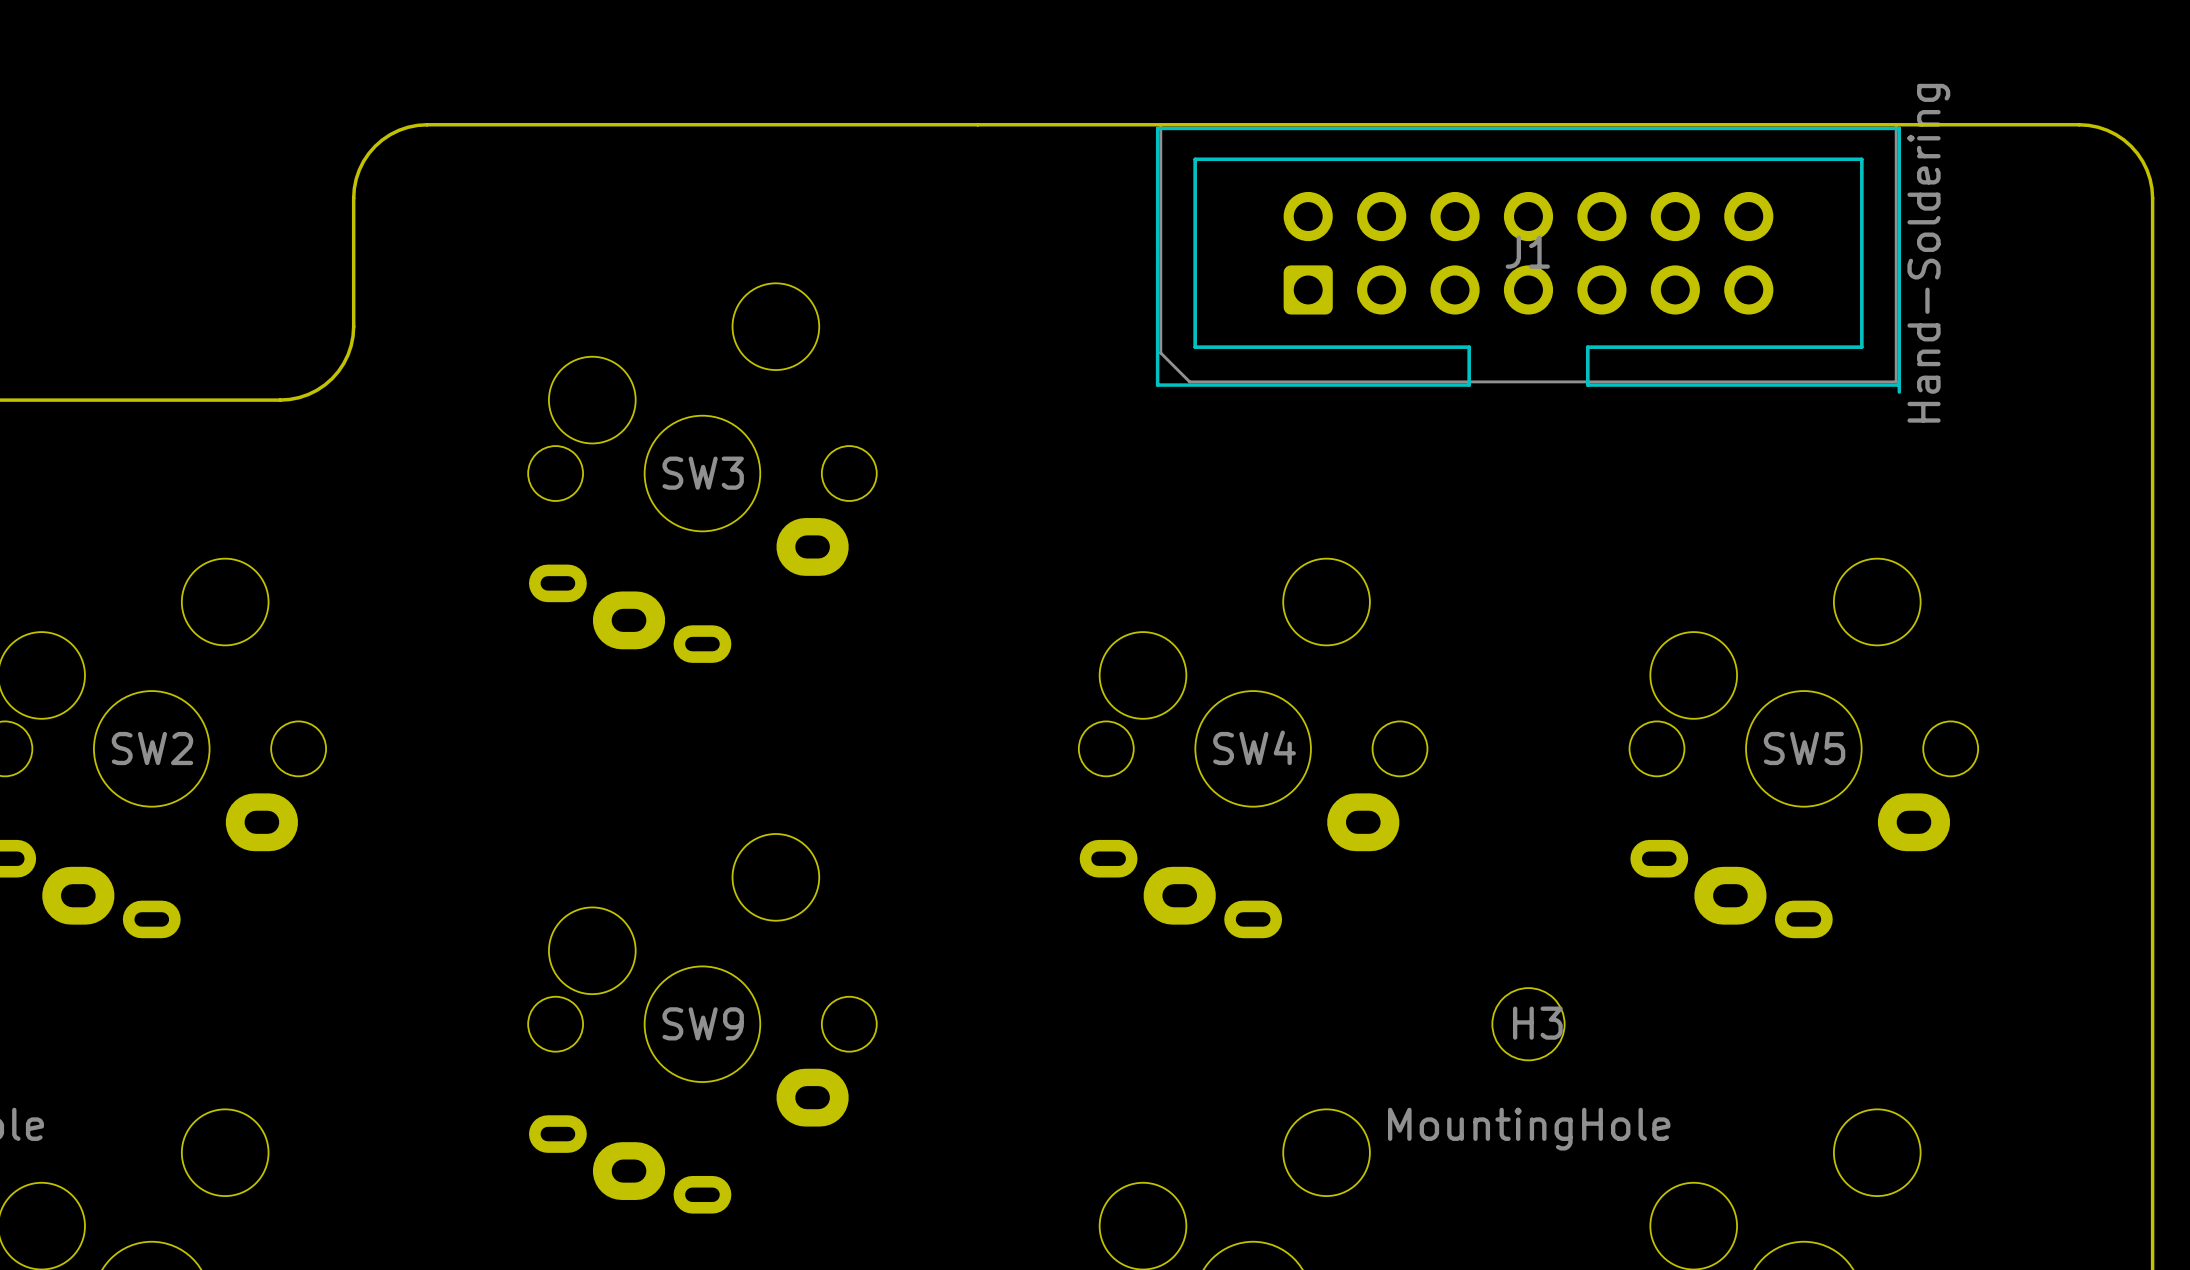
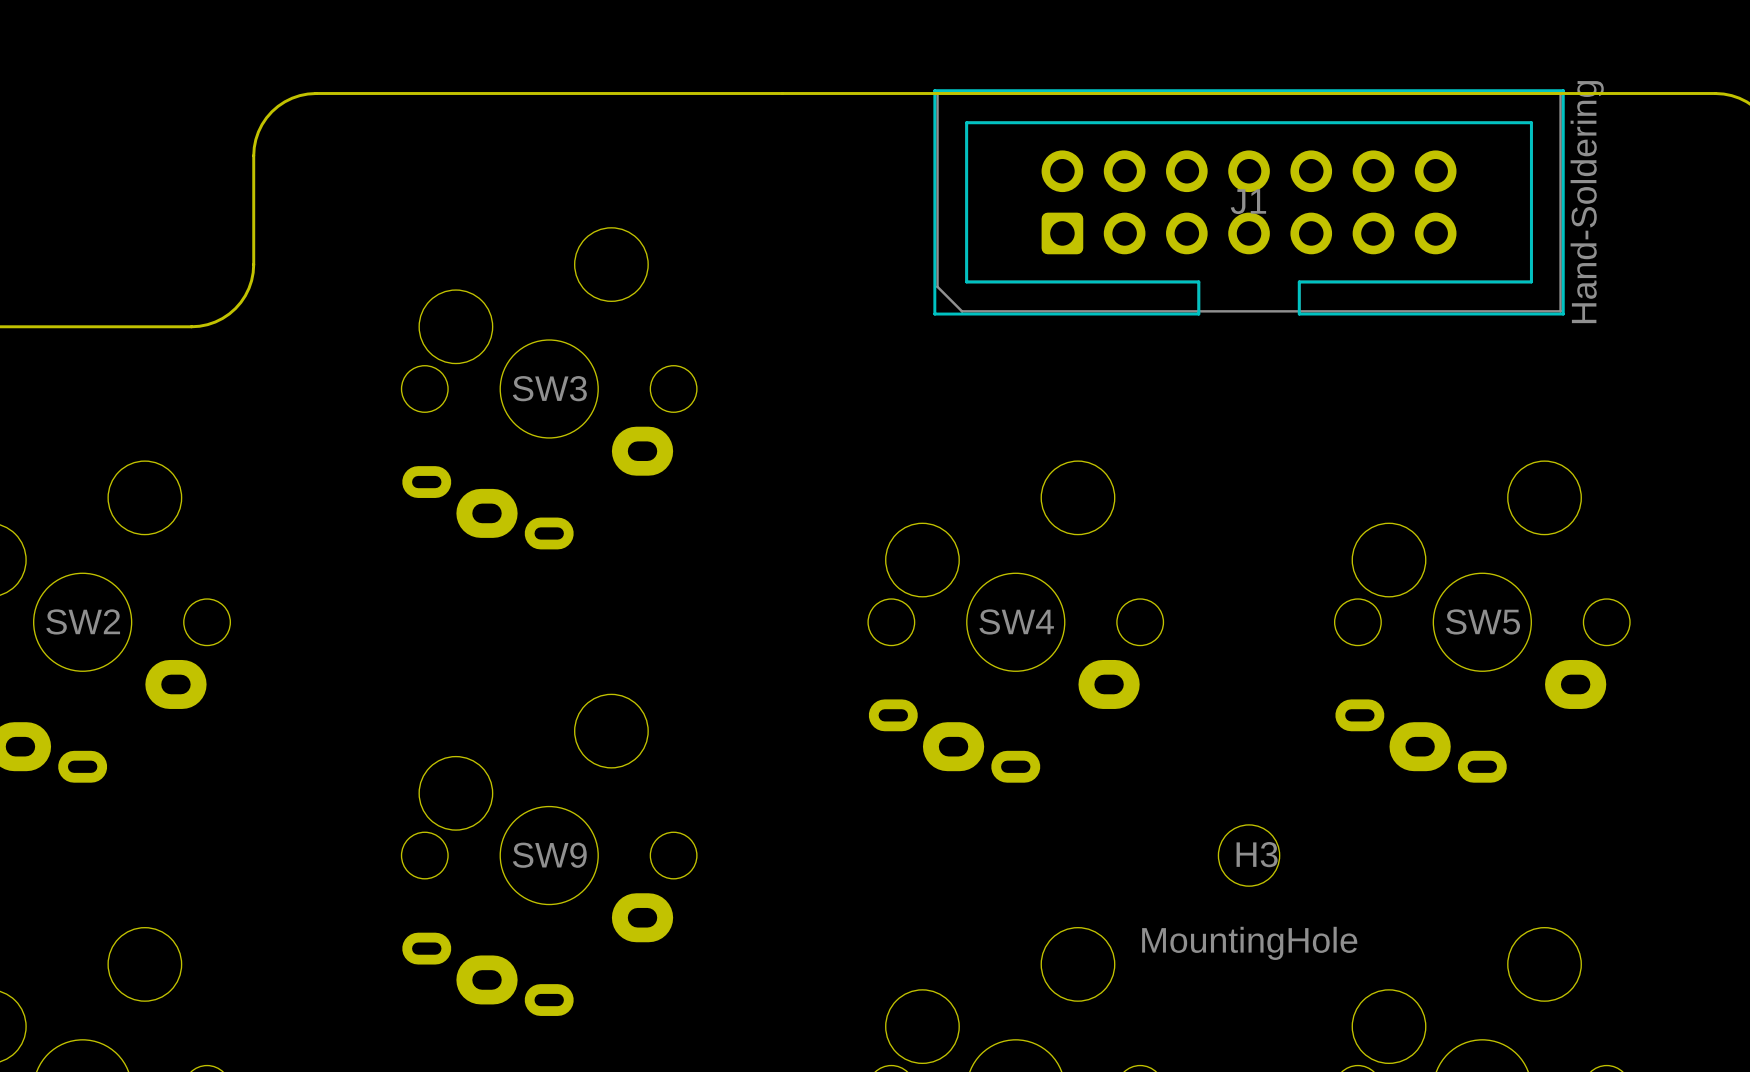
J1 footprint: [1155, 123, 1902, 394] -> [933, 89, 1565, 316]

